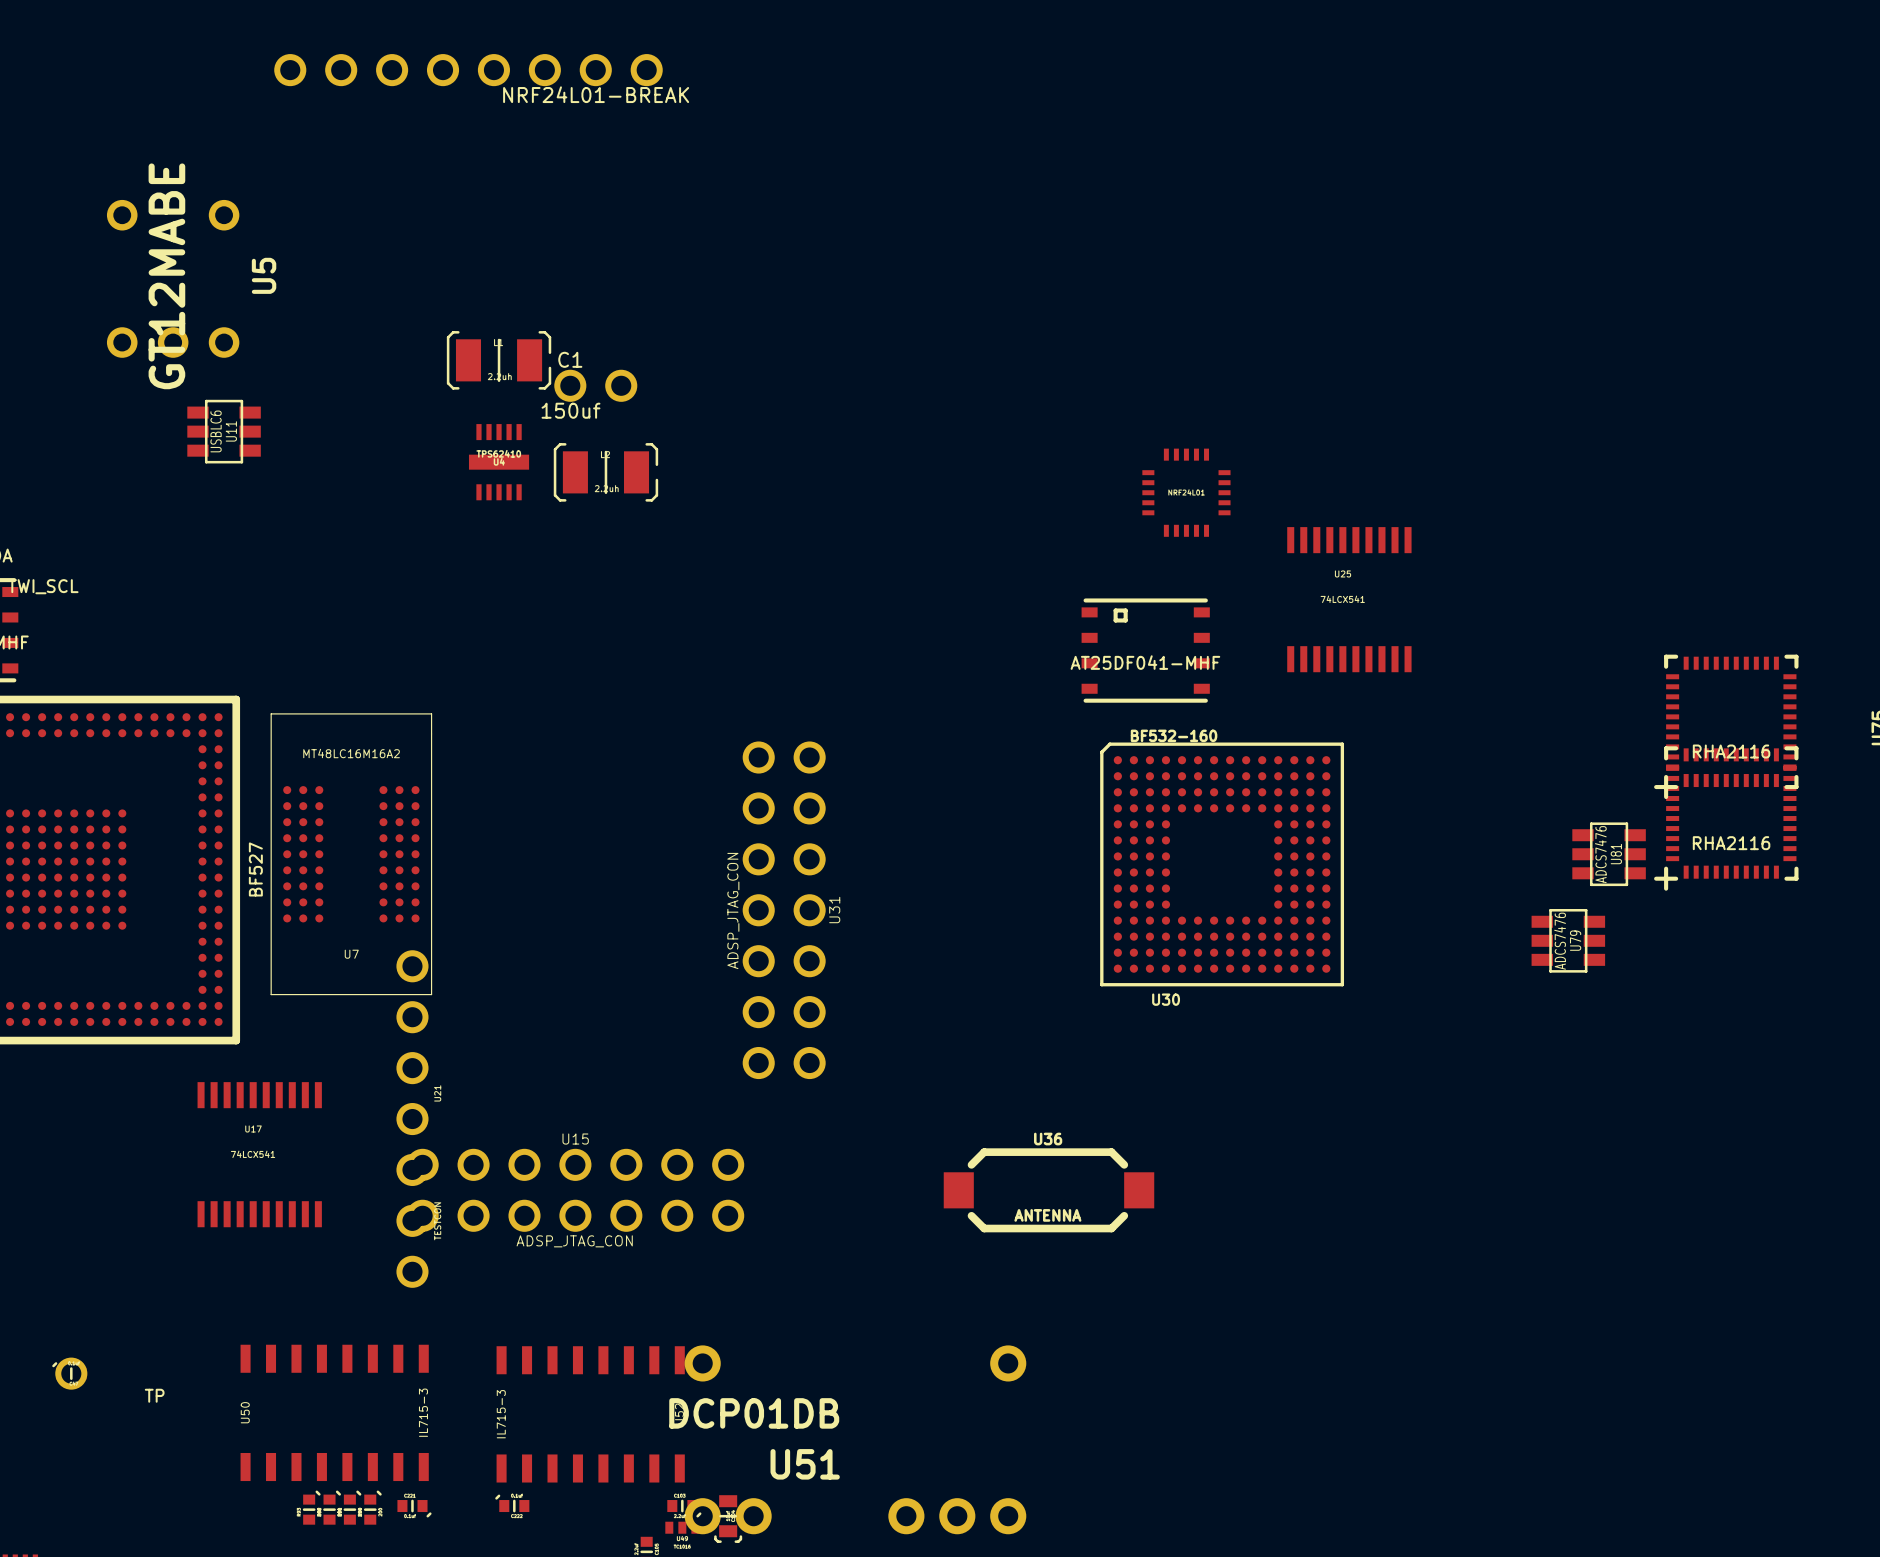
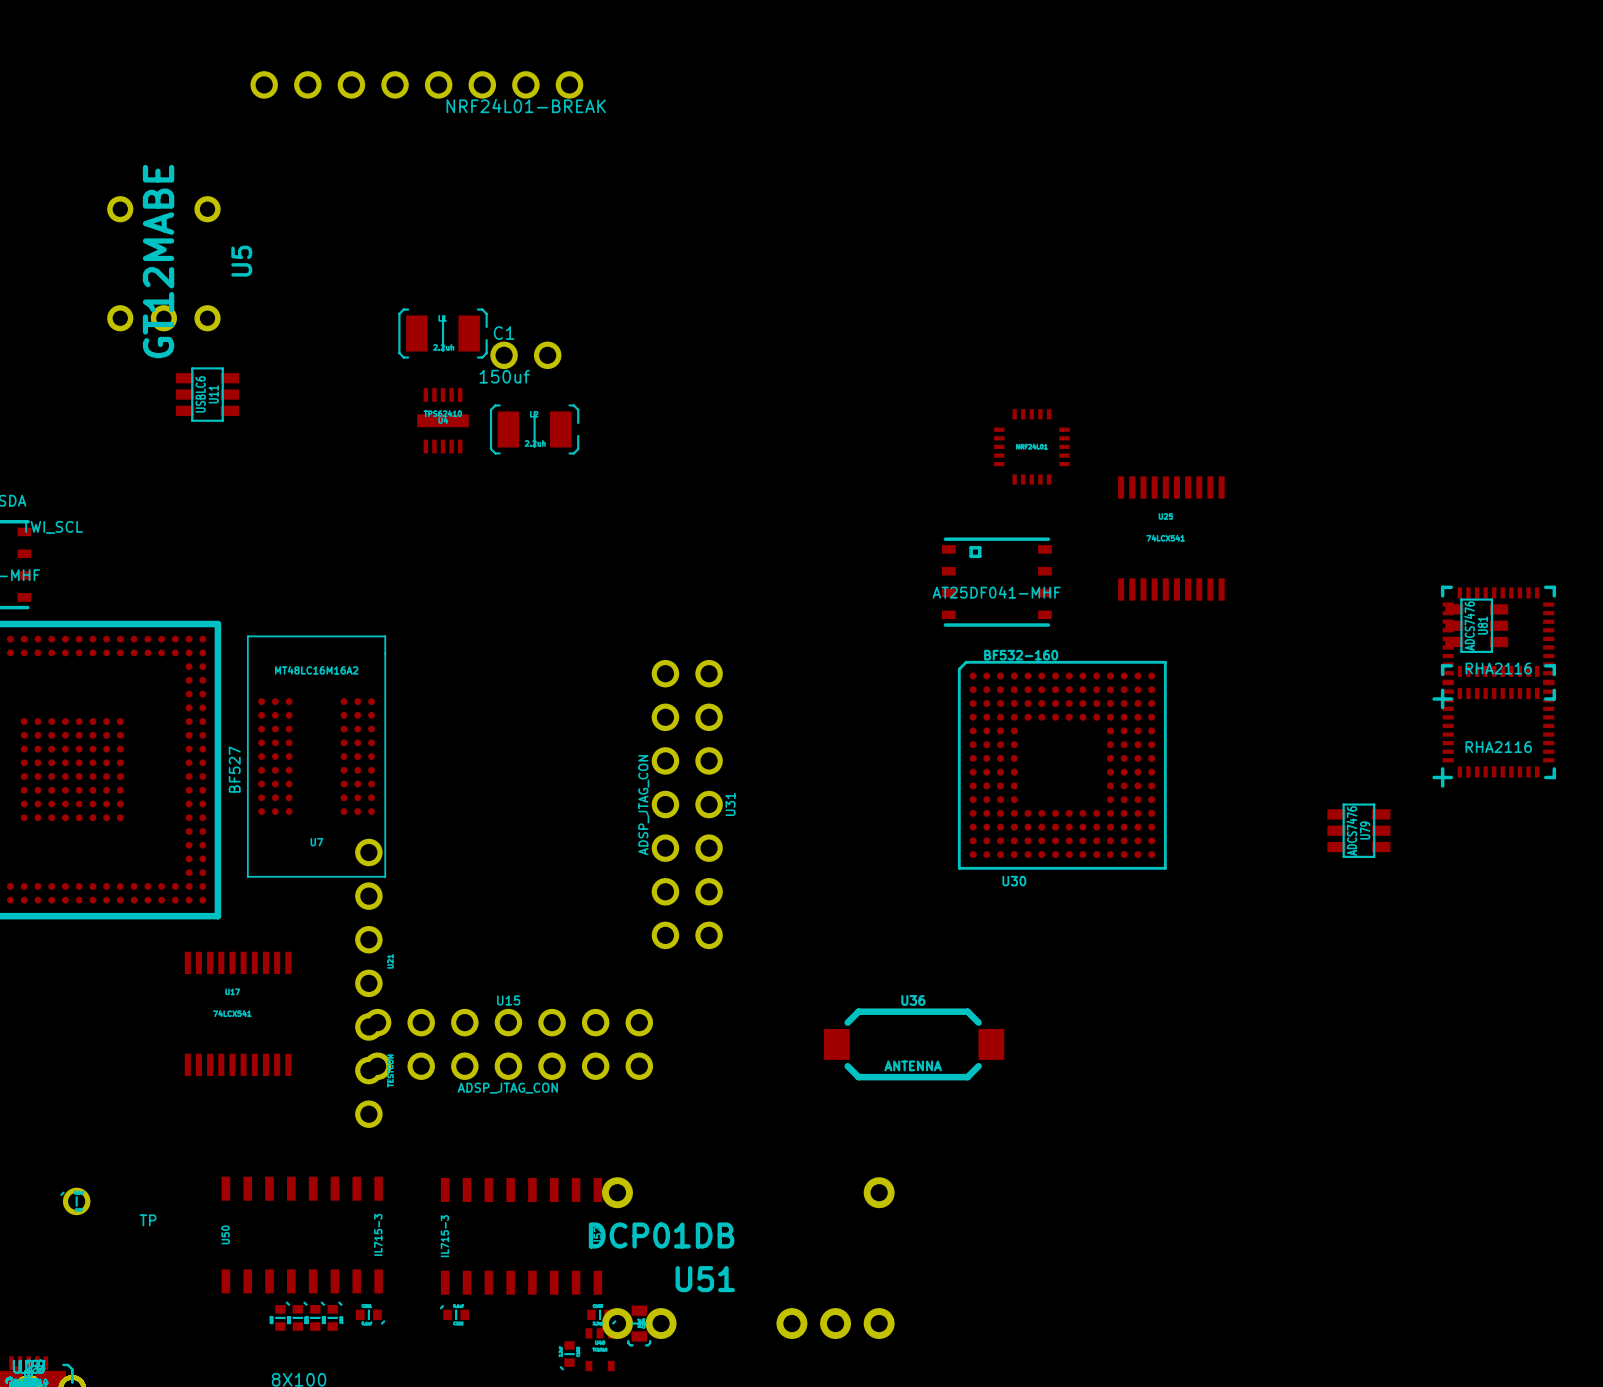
U81 position: (1609, 854) -> (1476, 625)

